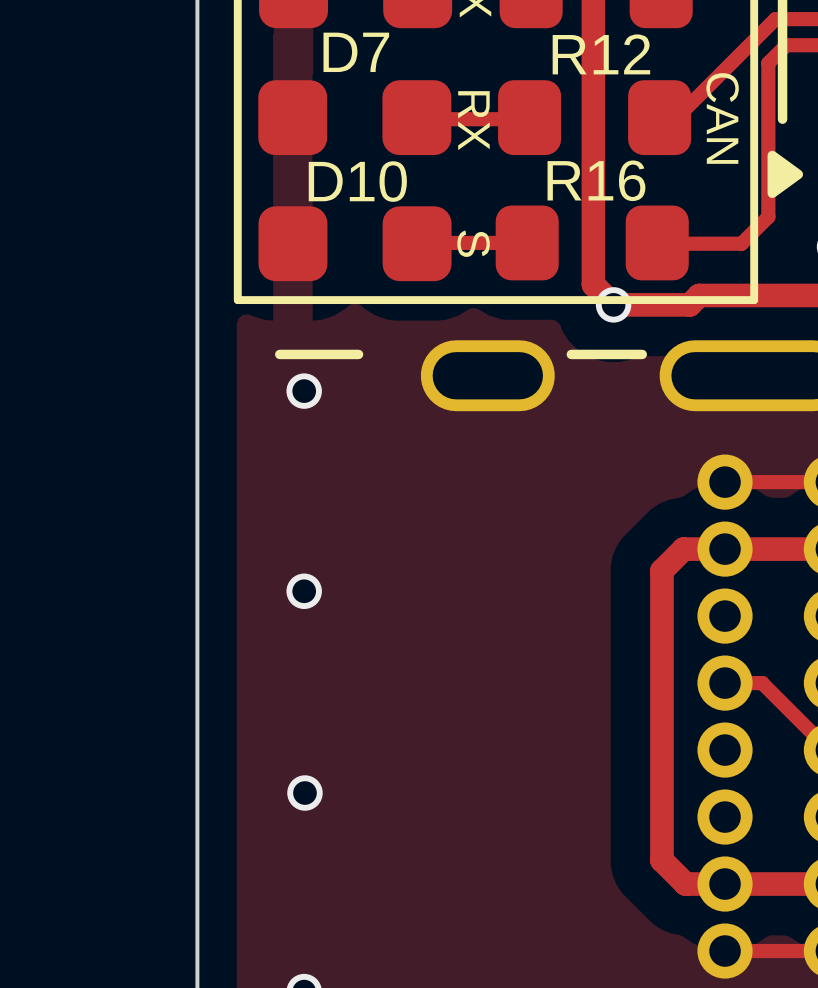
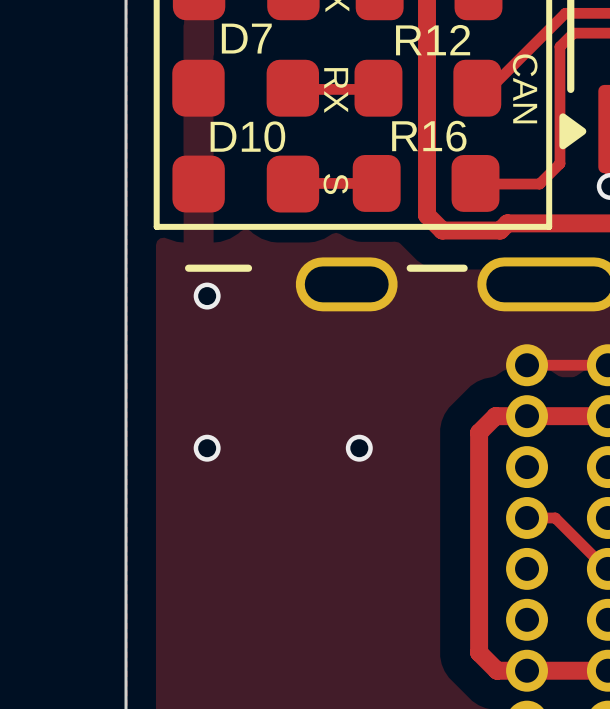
via: (613, 304) -> none
via: none -> (359, 448)
via: (304, 793) -> none

